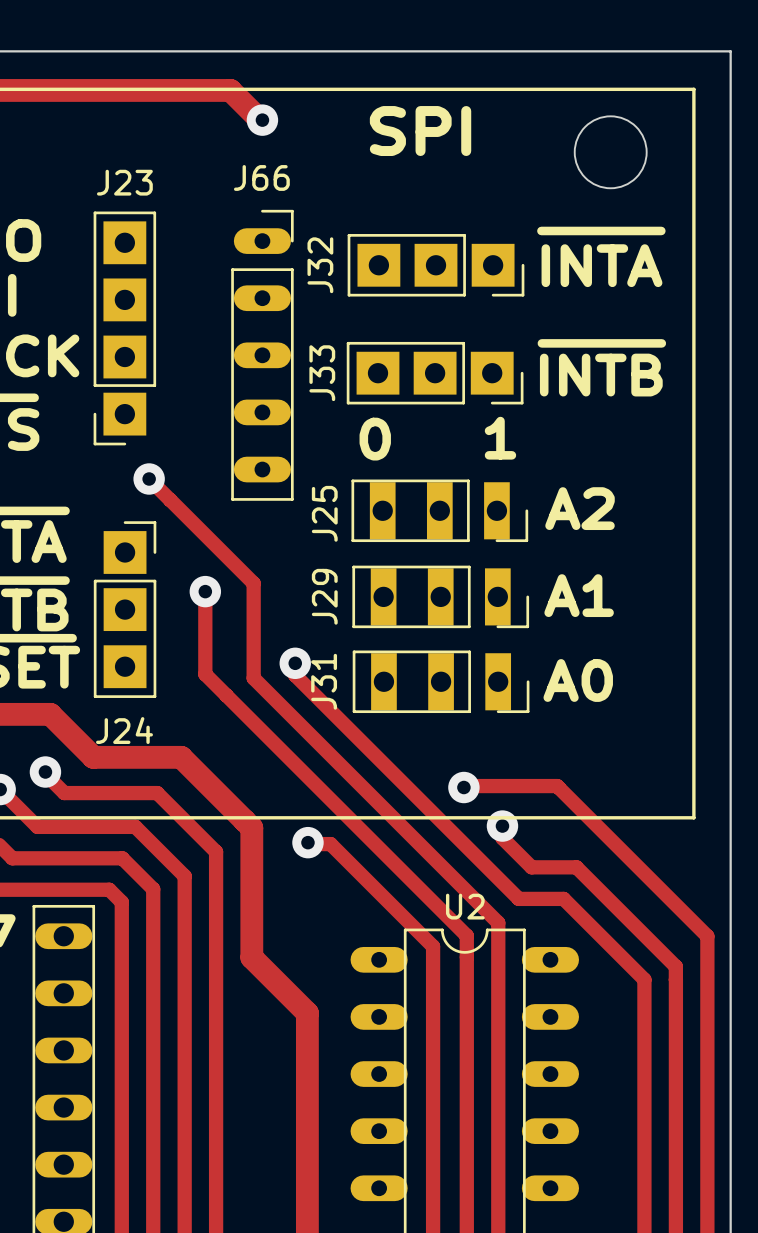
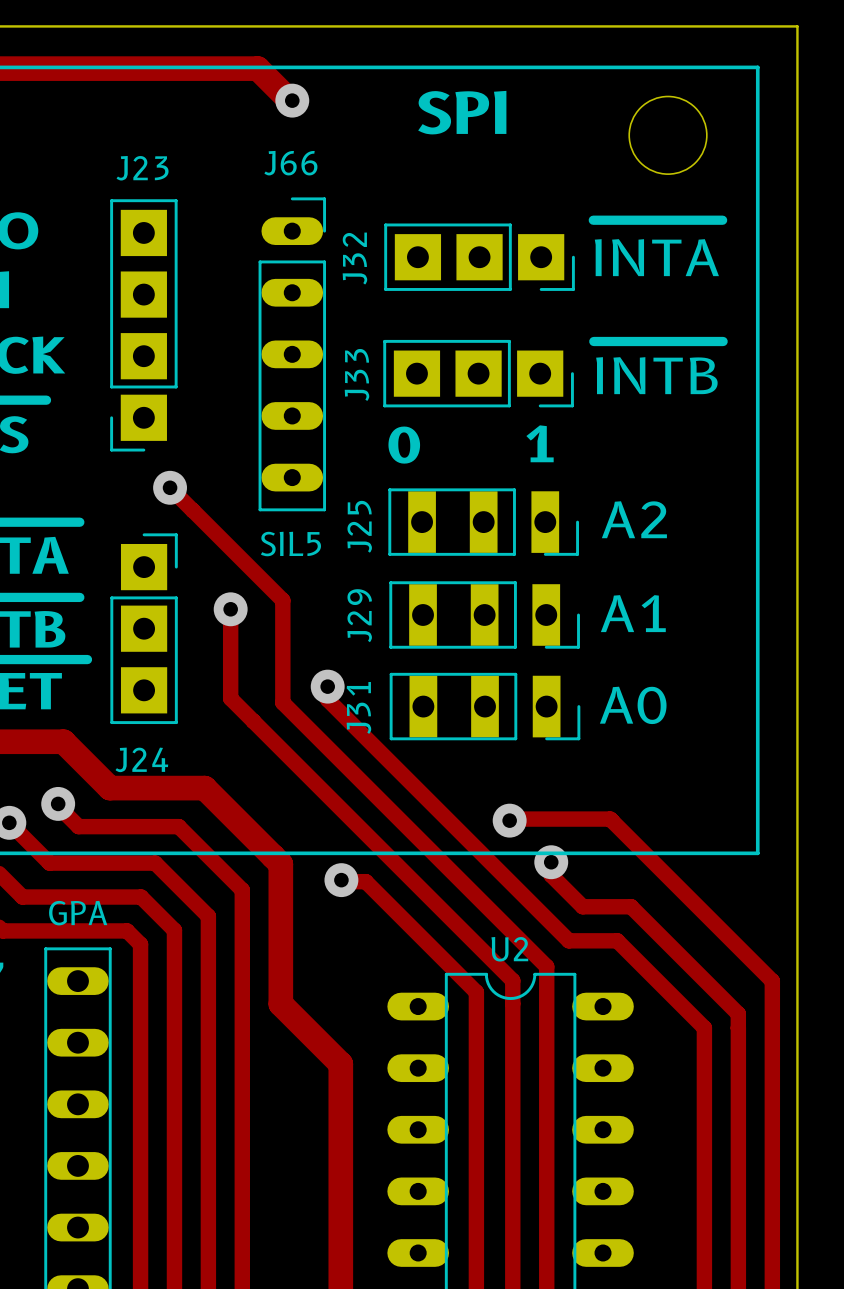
J66 value: none -> SIL5 (290, 544)
part value: none -> GPA (78, 913)

